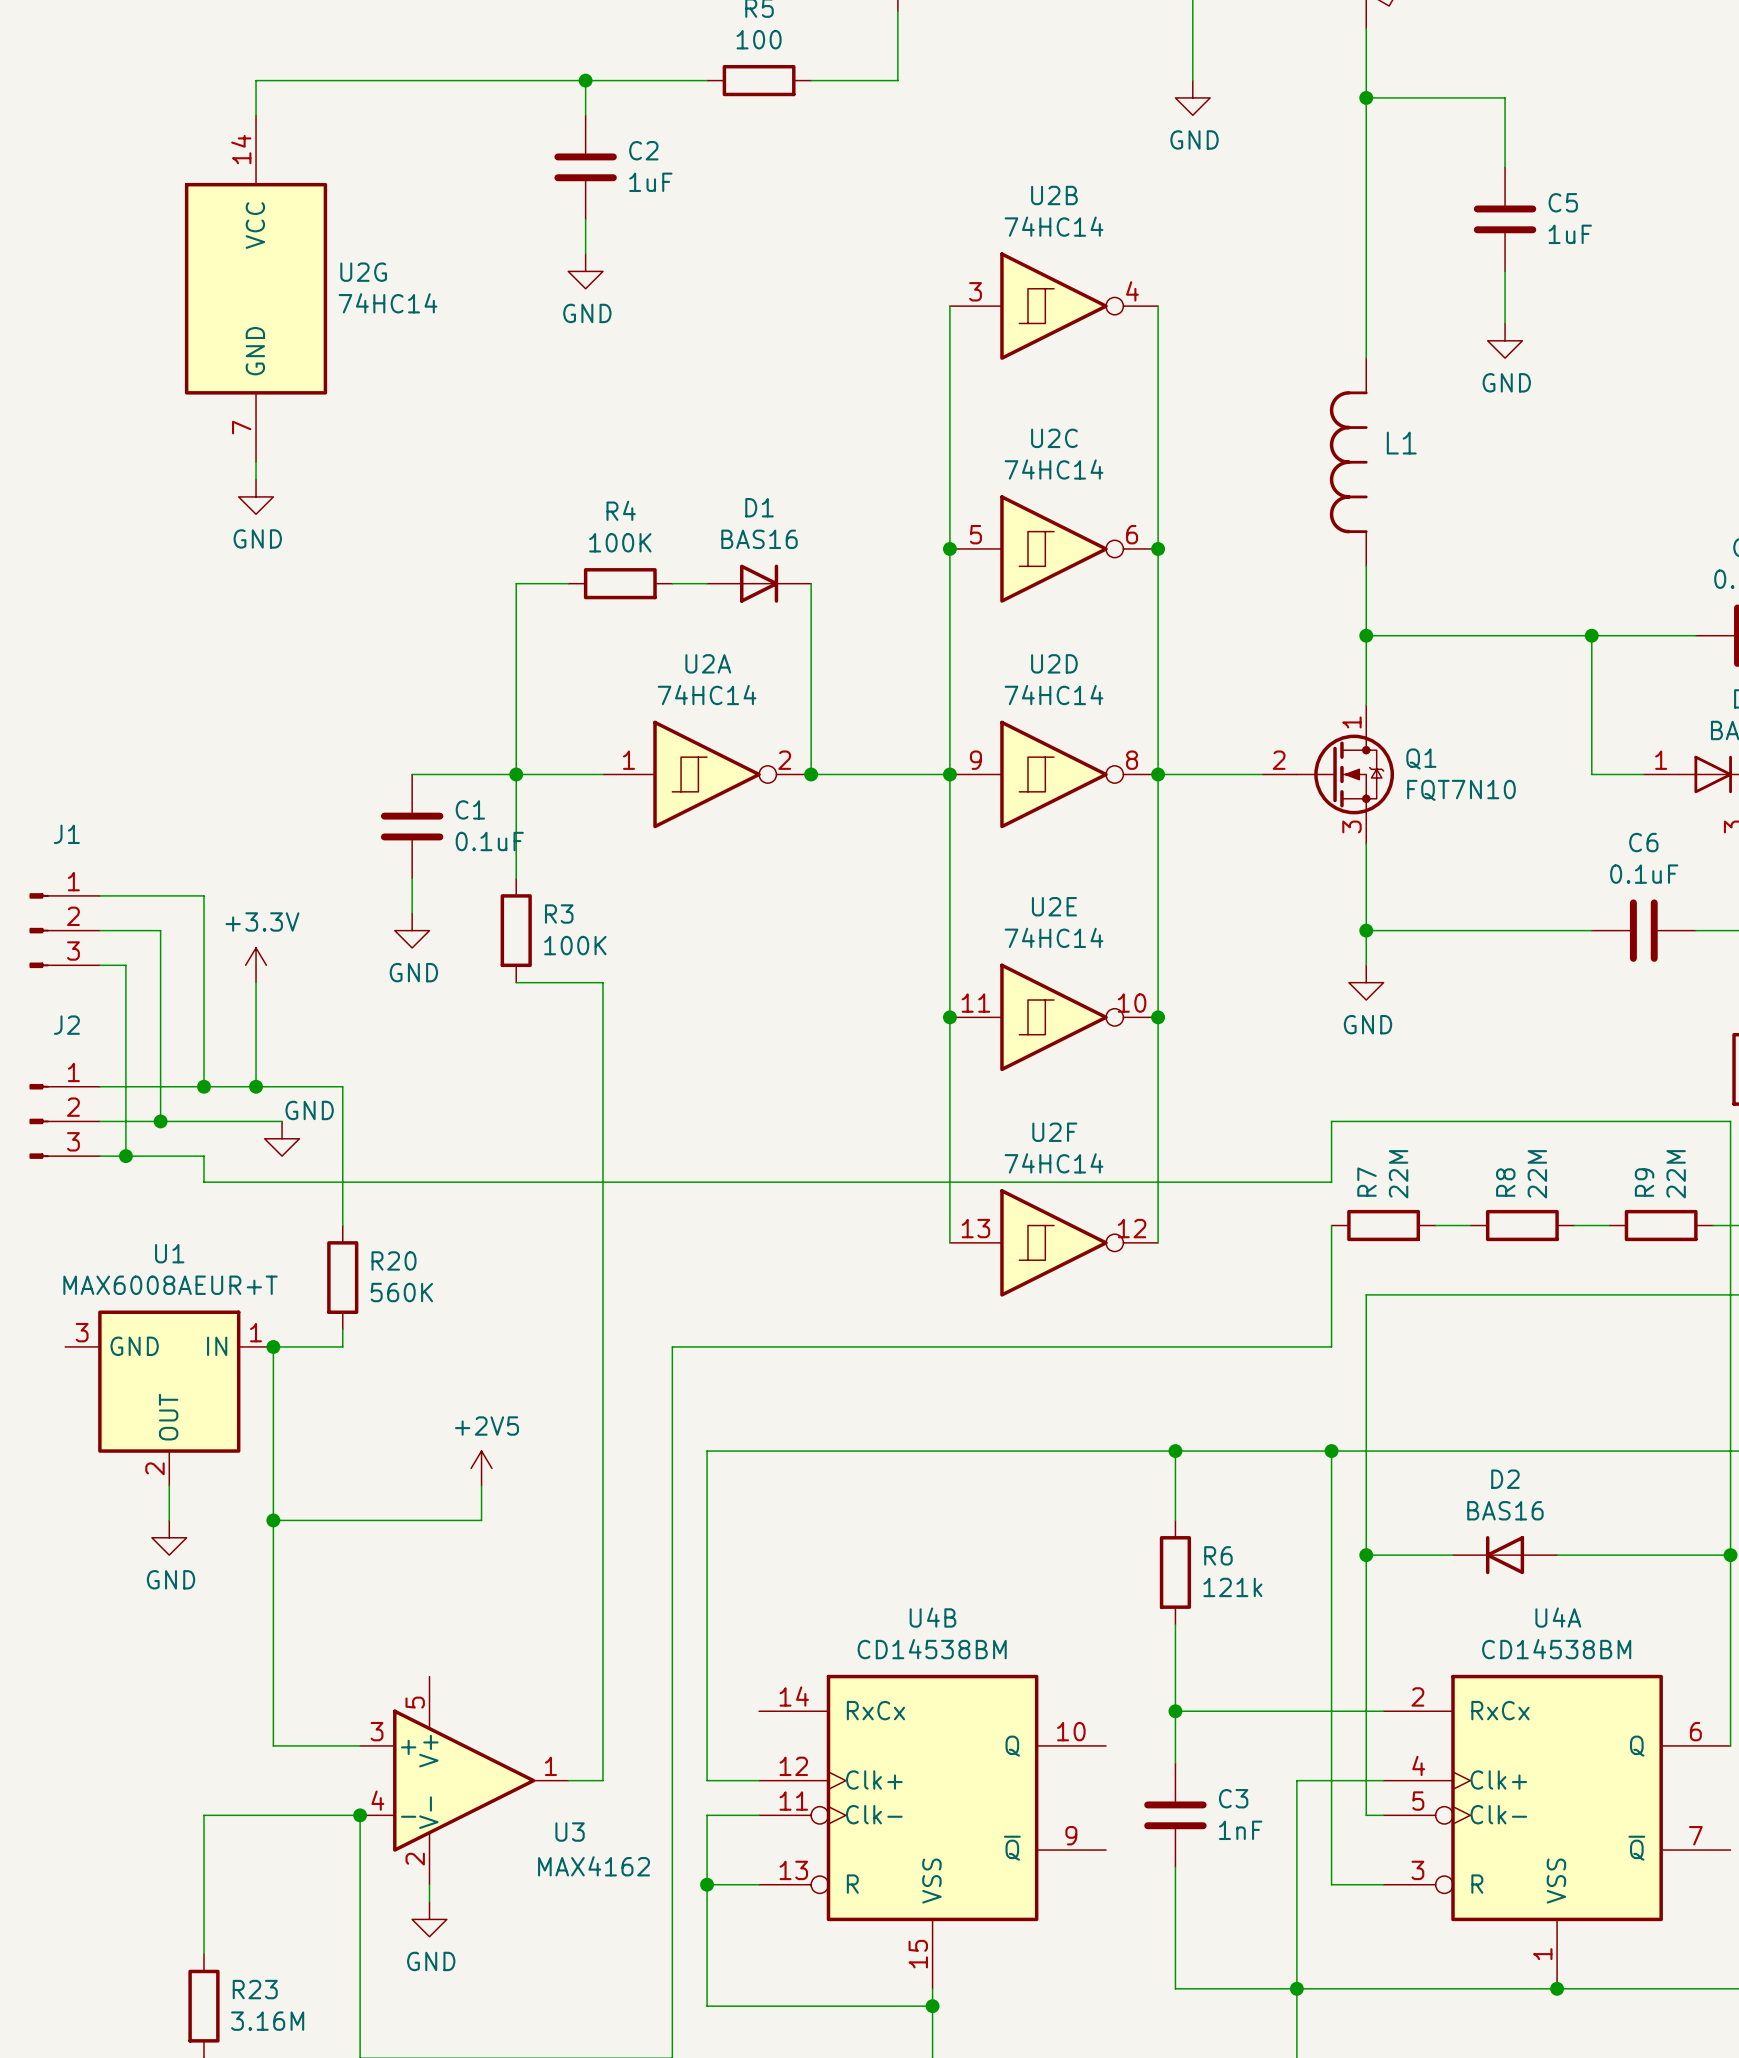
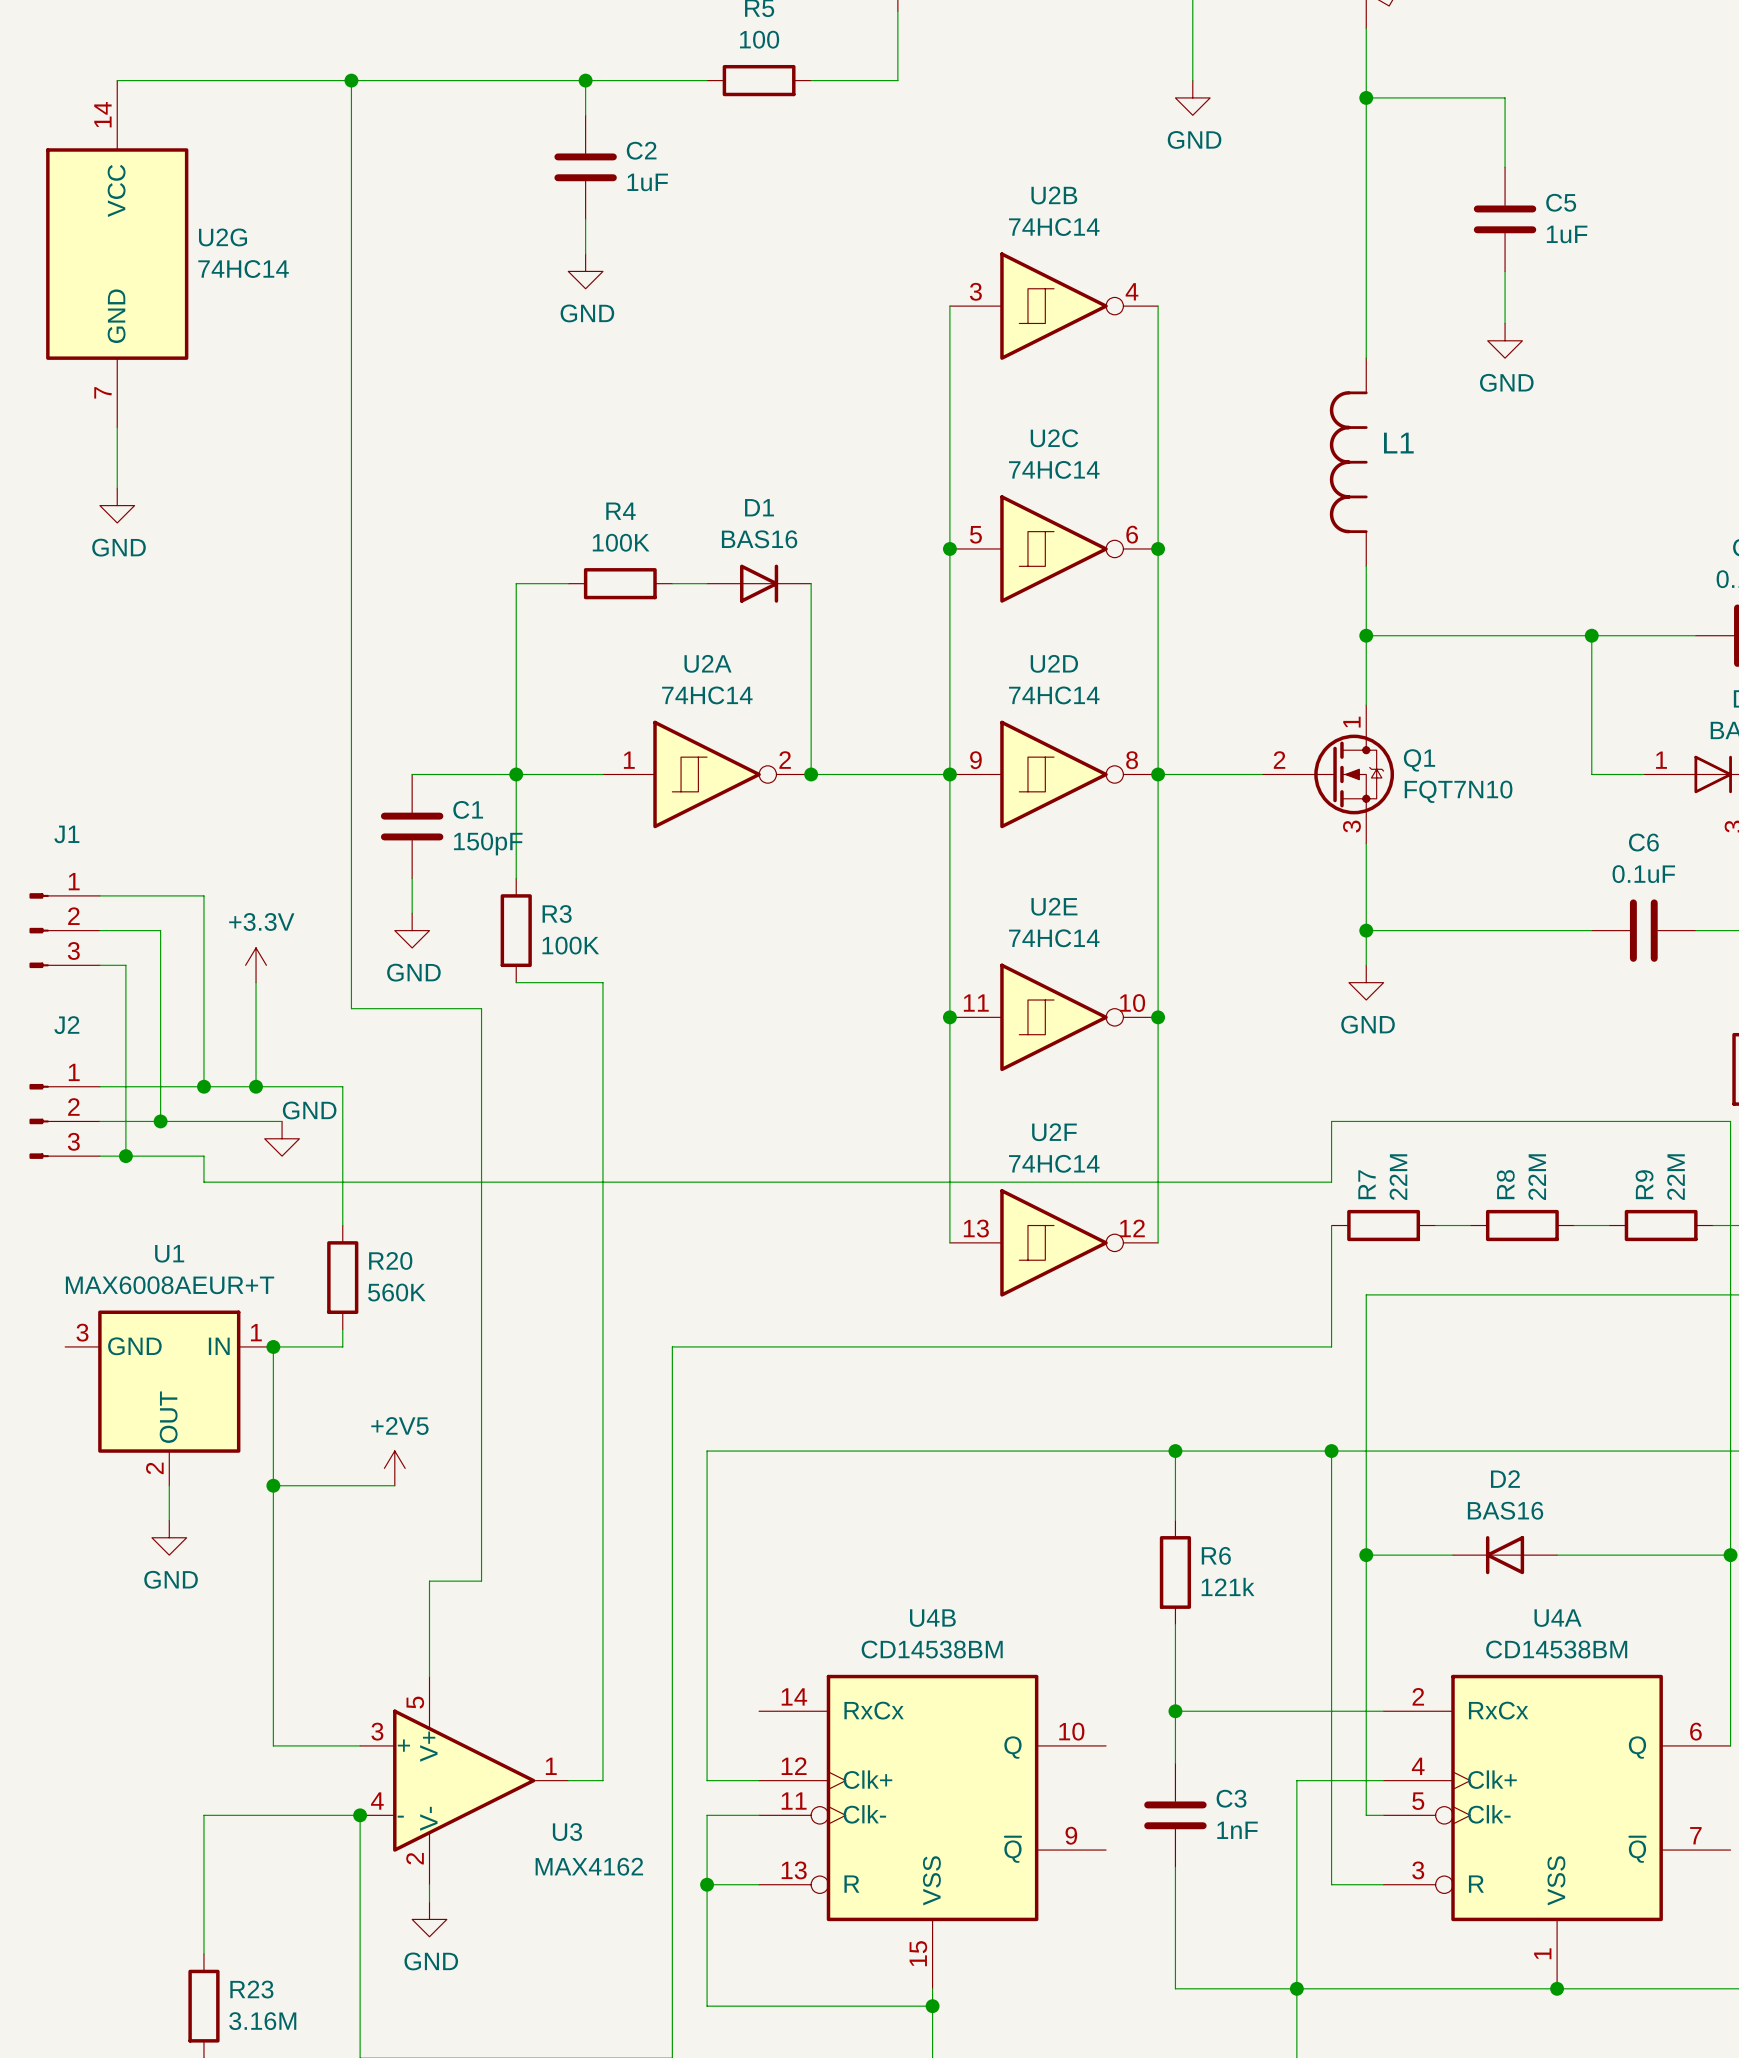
wire: (256, 80) (256, 115) -> (256, 80) (117, 80)
wire: none -> (351, 80) (351, 1008) (481, 1008) (481, 1485)
junction: none -> (351, 80)
U2G position: (256, 288) -> (117, 254)
wire: none -> (117, 427) (117, 488)
wire: (256, 462) (256, 479) -> none
power symbol position: GND (256, 496) -> GND (117, 505)
C1 value: 0.1uF (489, 841) -> 150pF (488, 843)
power symbol position: +2V5 (481, 1468) -> +2V5 (394, 1468)
wire: none -> (273, 1485) (394, 1485)
wire: (273, 1520) (481, 1520) -> (429, 1676) (429, 1581) (481, 1581) (481, 1520)
junction position: (273, 1520) -> (273, 1485)

